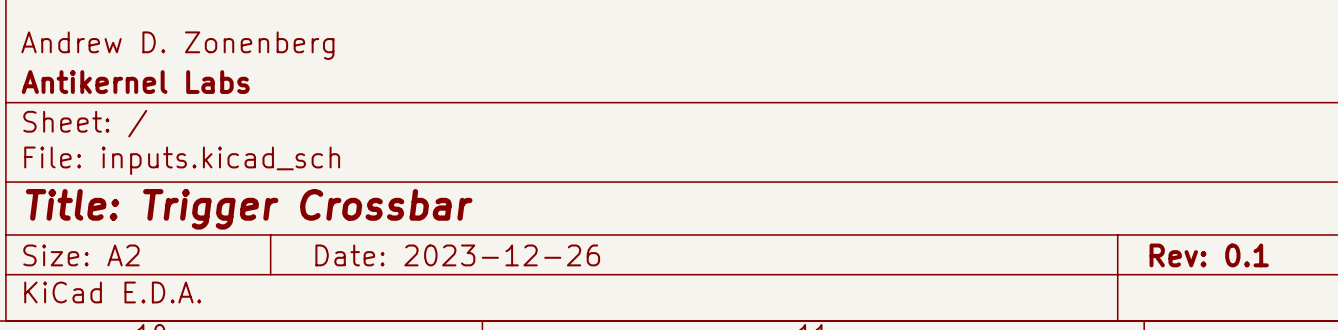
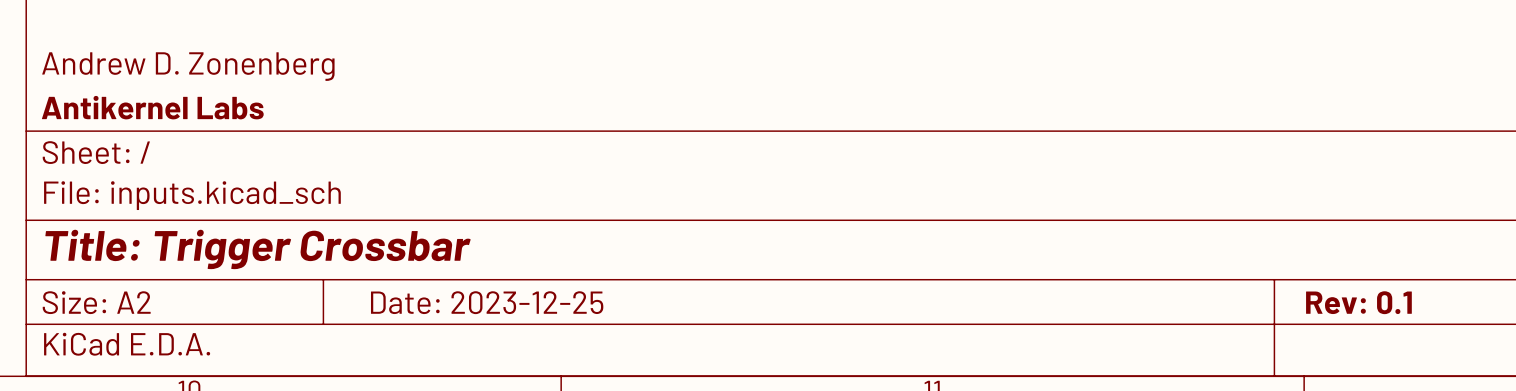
title block: Date: 2023-12-26 (457, 255) -> Date: 2023-12-25 (487, 302)

